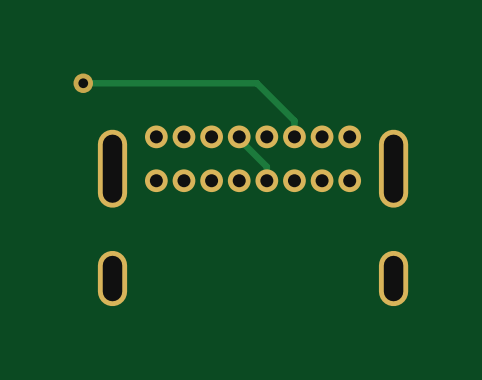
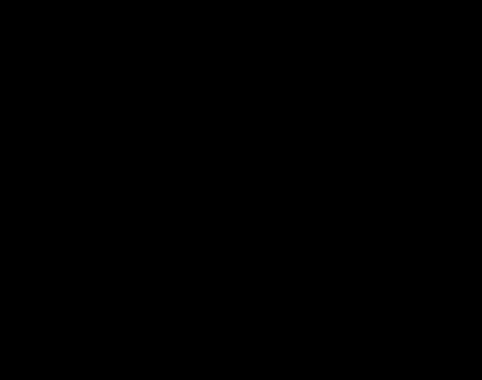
track: (83, 83) (256, 83) (294, 120) (294, 136) -> none
via: (83, 83) -> none
track: (239, 136) (239, 139) (266, 166) (266, 180) -> none
part: (253, 215) -> none

